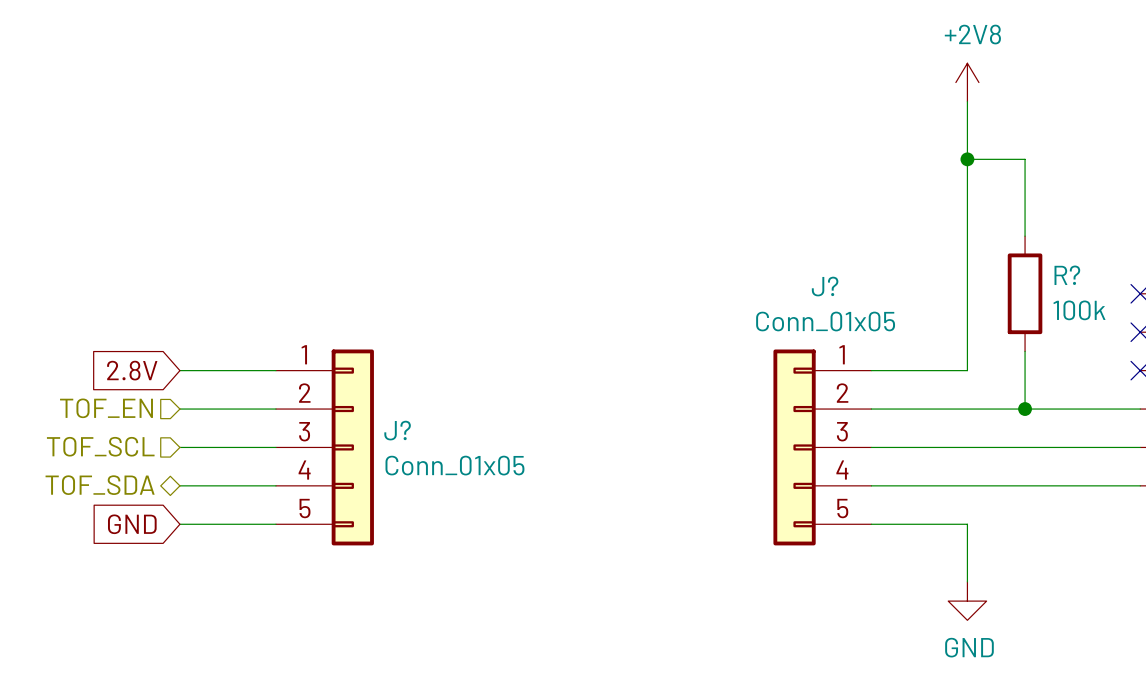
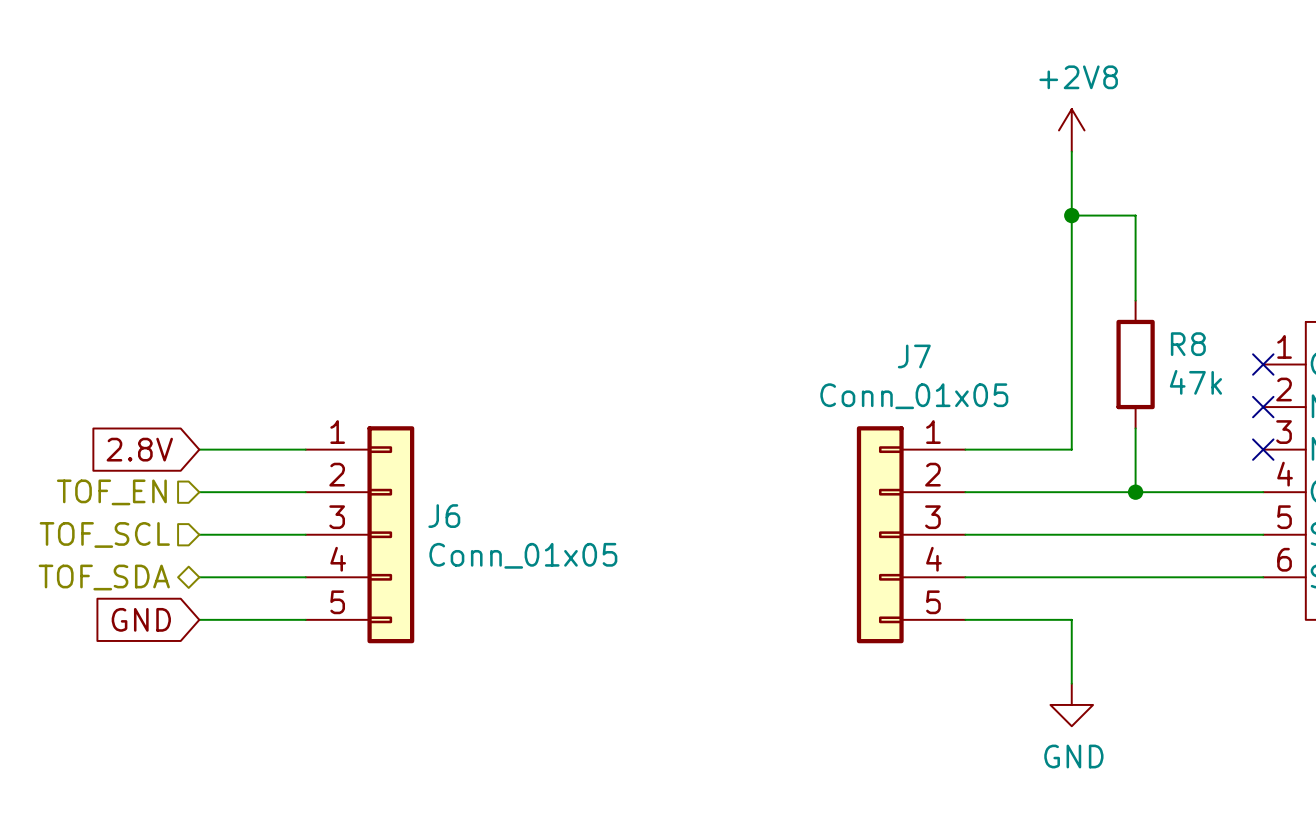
R? name: R? (1067, 275) -> R8 (1188, 344)
J? name: J? (825, 286) -> J7 (914, 356)
R? value: 100k (1079, 310) -> 47k (1195, 382)
J? name: J? (397, 430) -> J6 (444, 516)

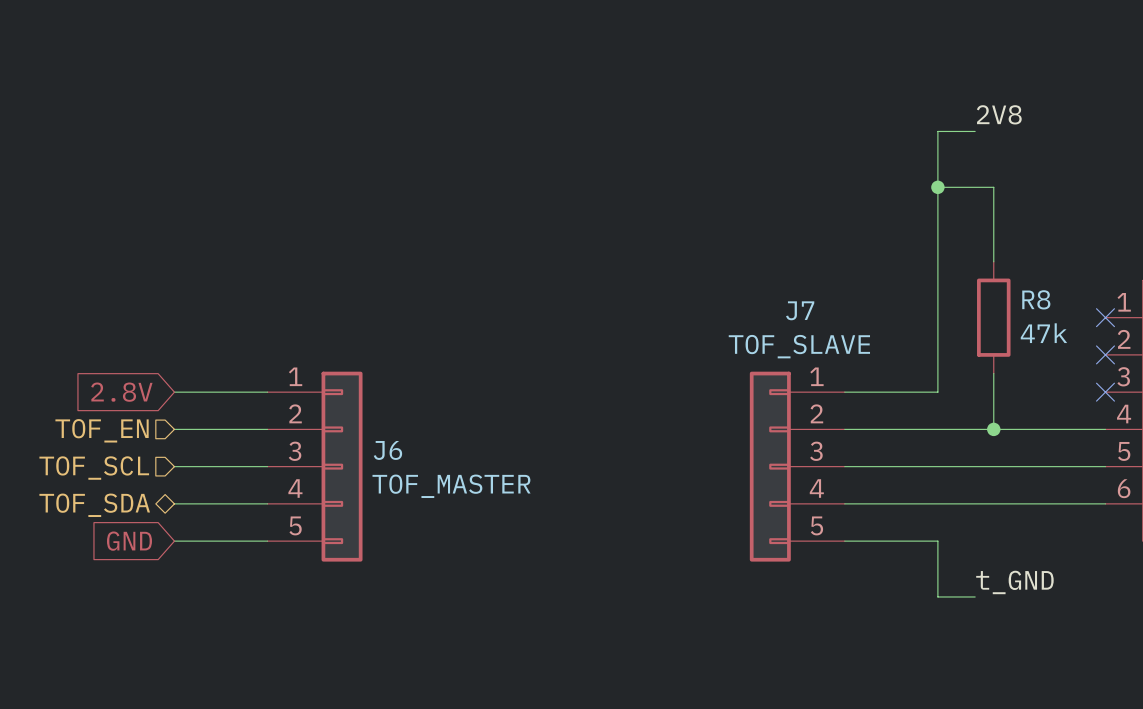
power symbol: +2V8 (1071, 130) -> none
label: none -> 2V8 (999, 114)
wire: none -> (937, 131) (975, 131)
J7 value: Conn_01x05 (914, 396) -> TOF_SLAVE (799, 346)
J6 value: Conn_01x05 (523, 555) -> TOF_MASTER (451, 486)
label: none -> t_GND (1014, 582)
wire: none -> (937, 596) (975, 596)
power symbol: GND (1071, 704) -> none

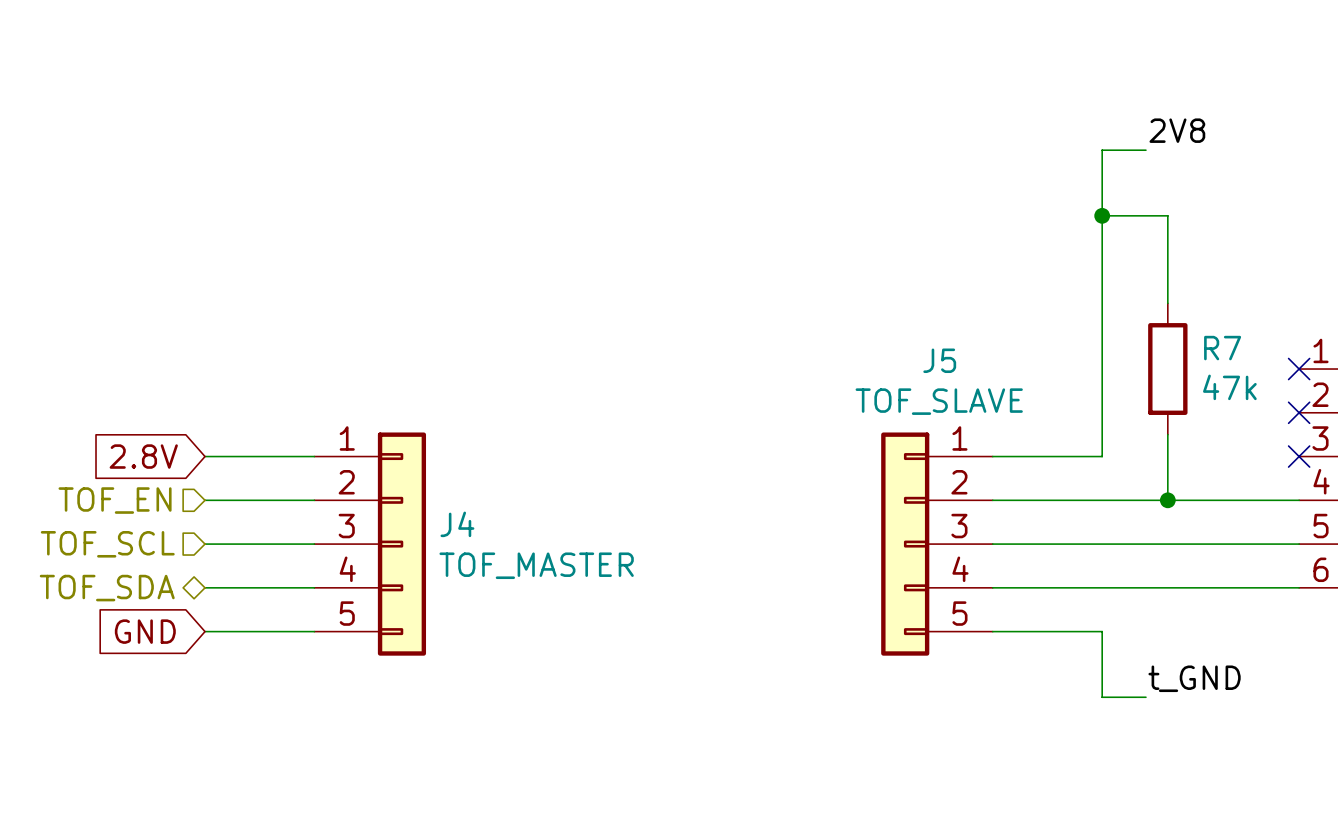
R8 name: R8 (1036, 299) -> R7 (1222, 348)
J7 name: J7 (800, 310) -> J5 (939, 360)
J6 name: J6 (387, 450) -> J4 (457, 524)

